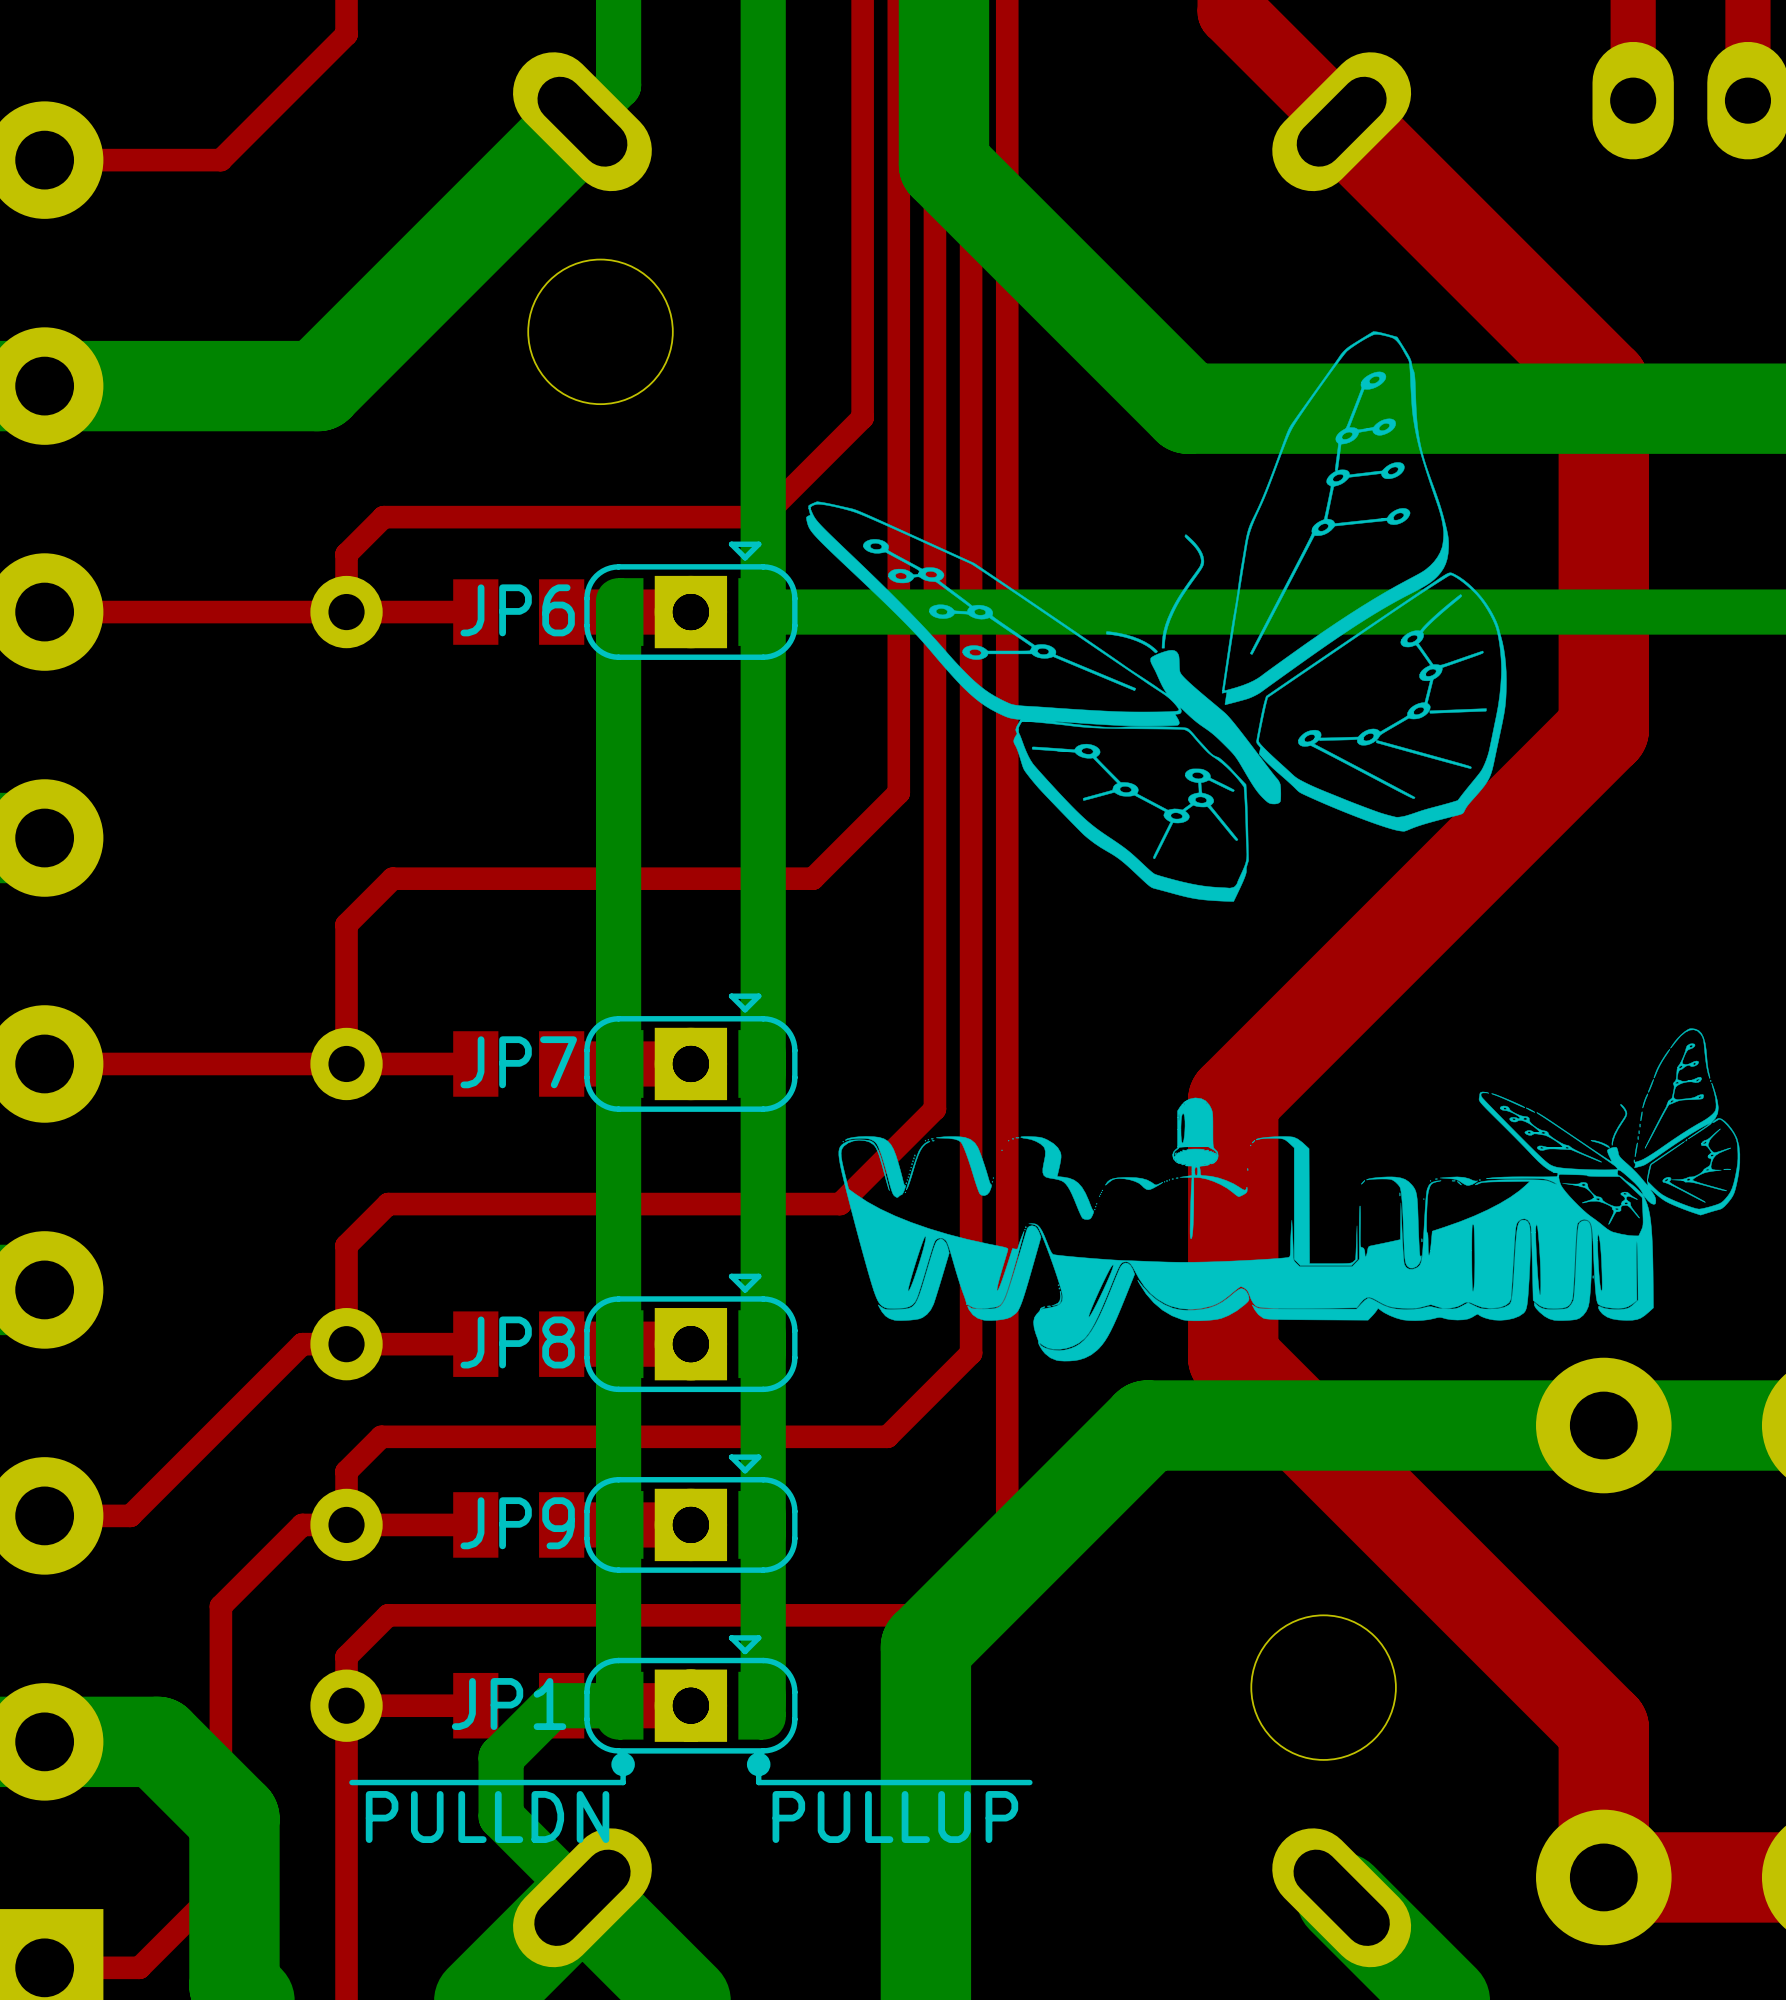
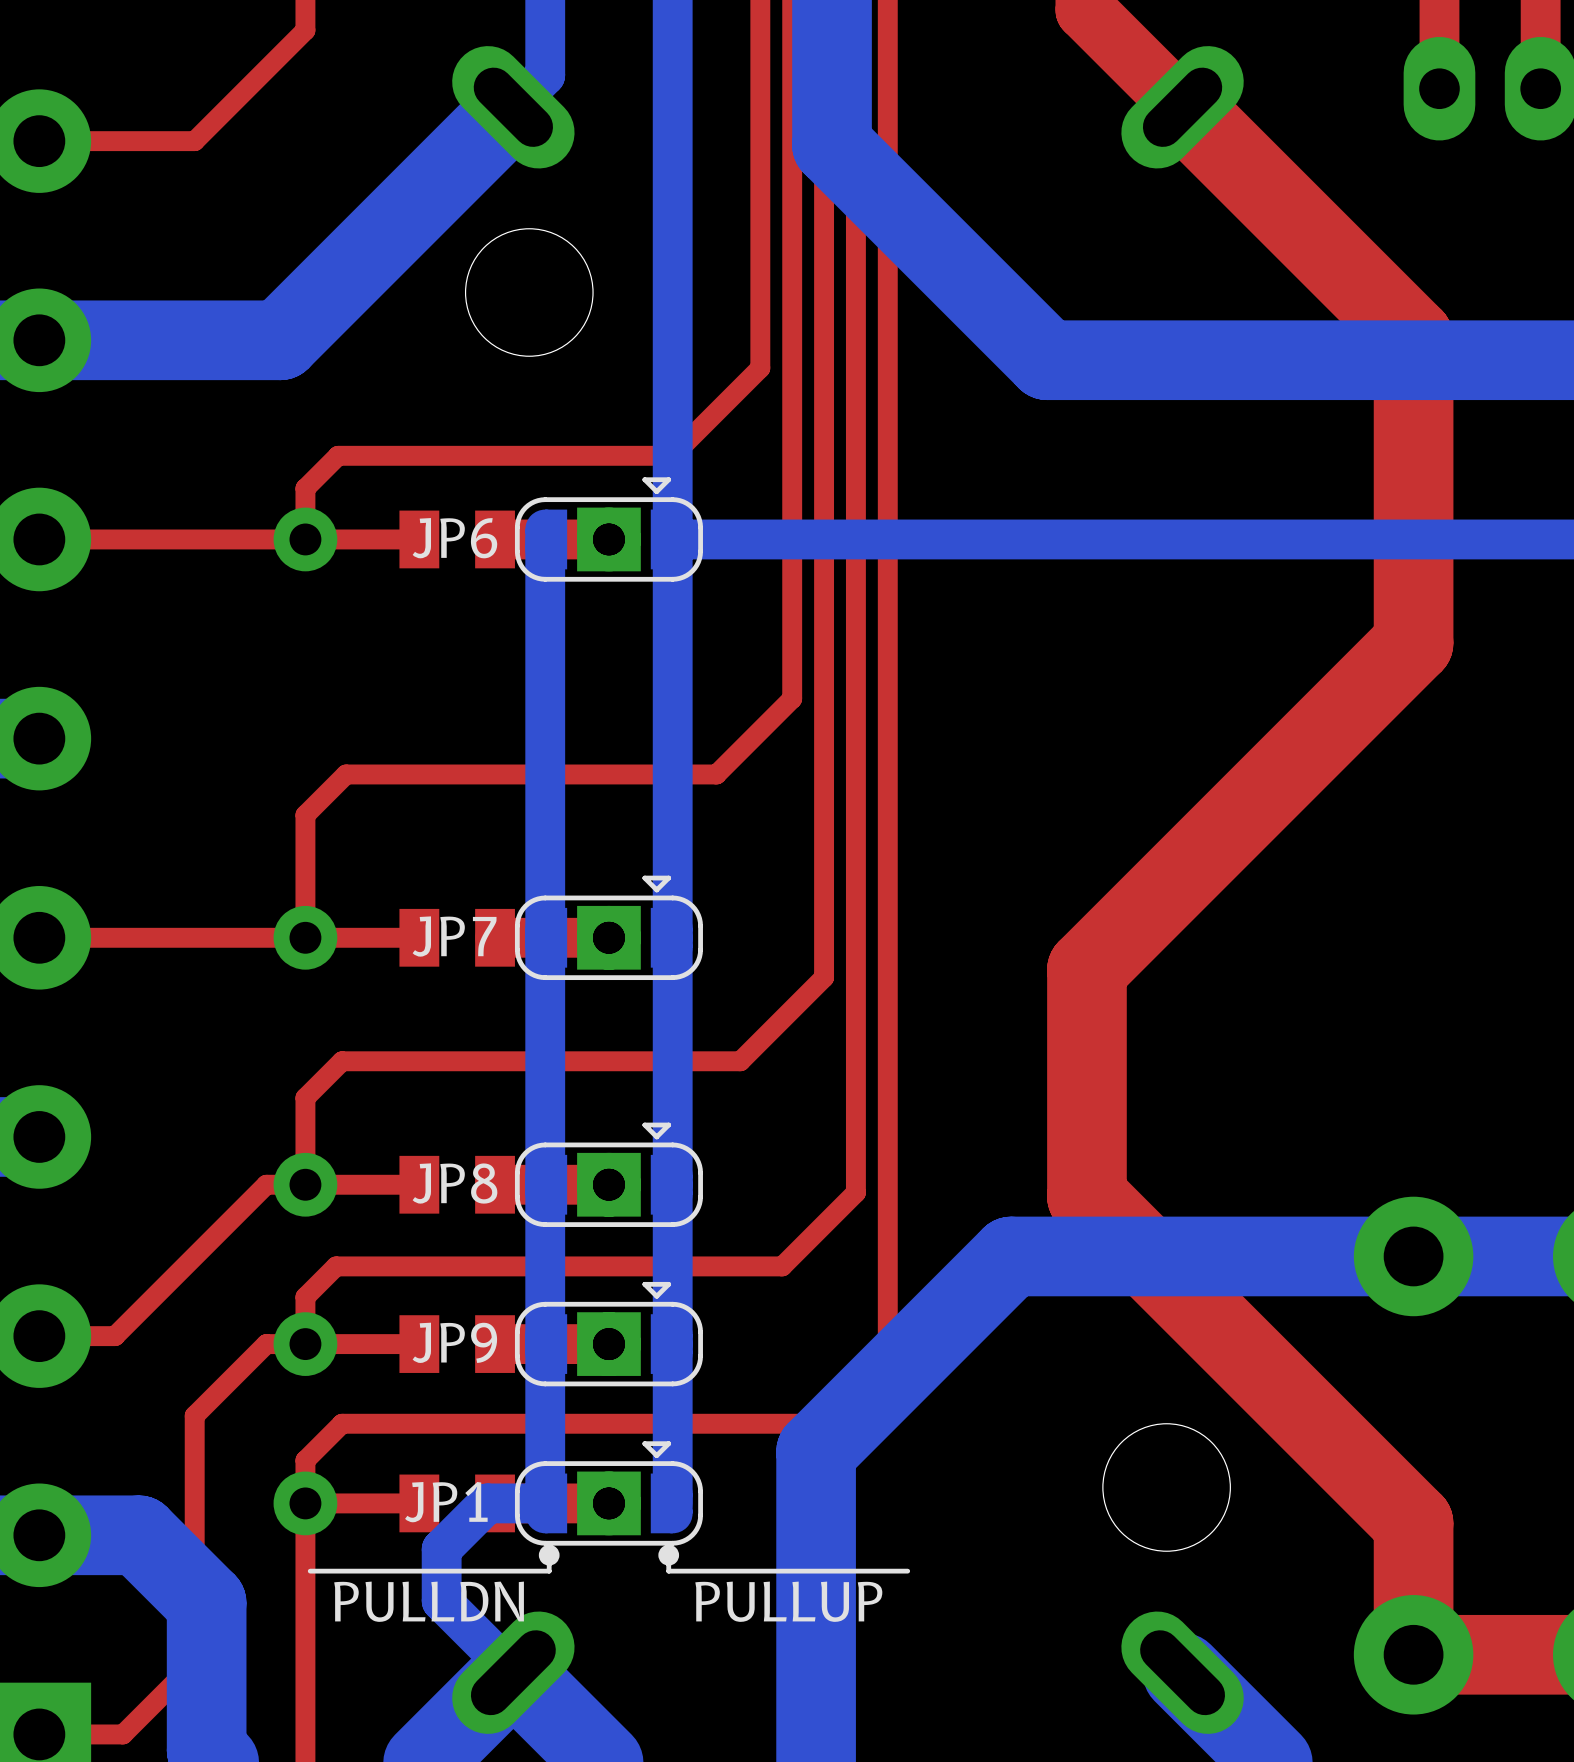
drawing: [806, 331, 1507, 902] -> none
drawing: [838, 1028, 1741, 1362] -> none

